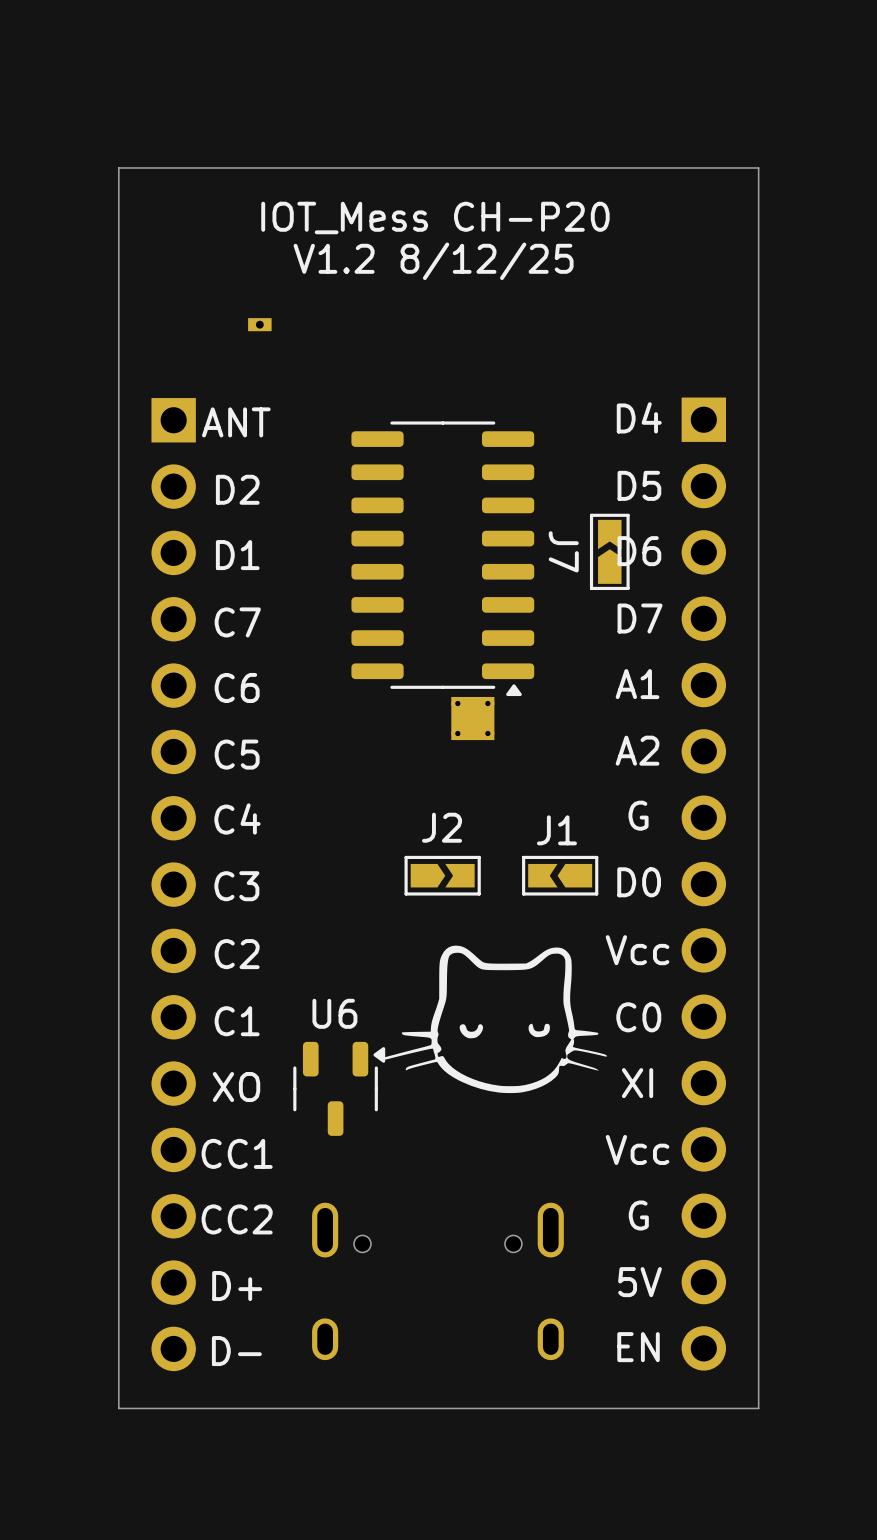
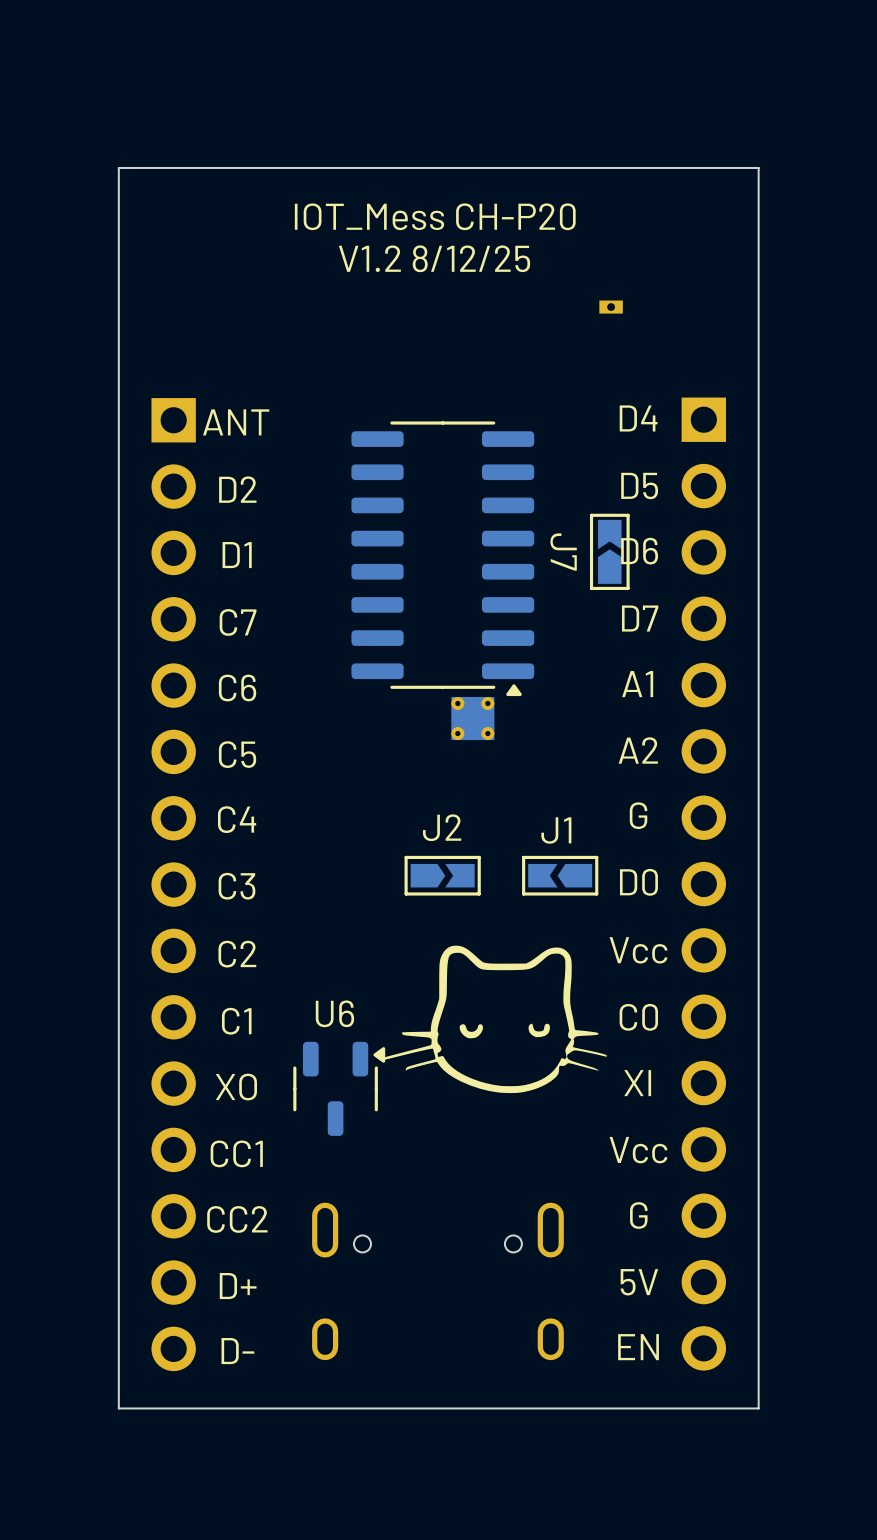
part position: (259, 324) -> (611, 307)

